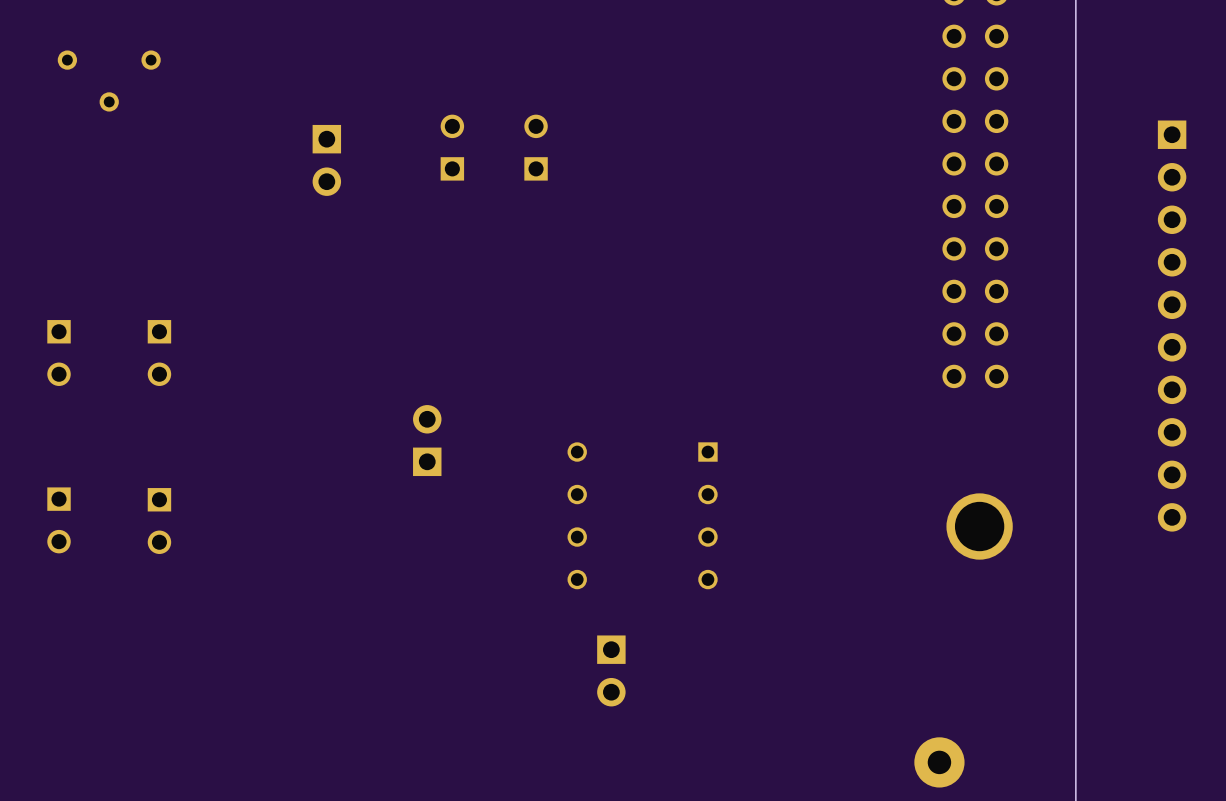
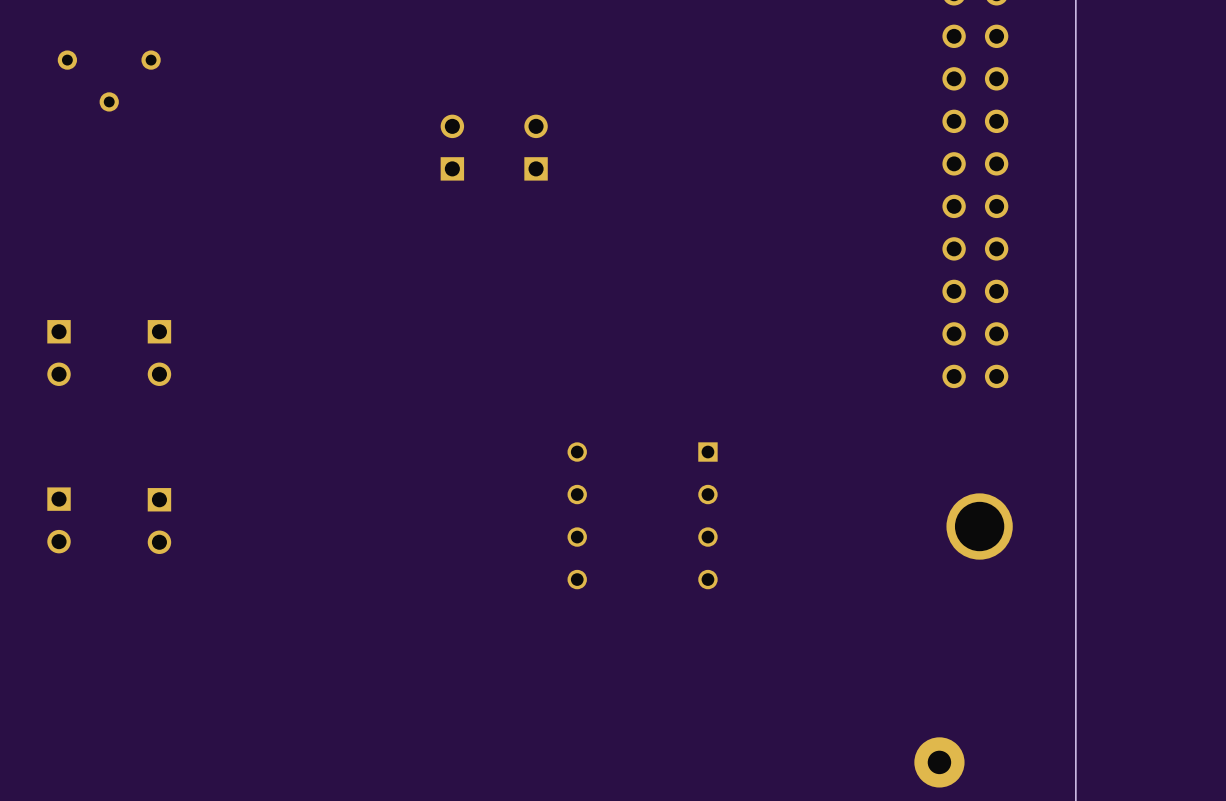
part: (326, 160) -> none
part: (1172, 326) -> none
part: (427, 440) -> none
part: (611, 670) -> none

